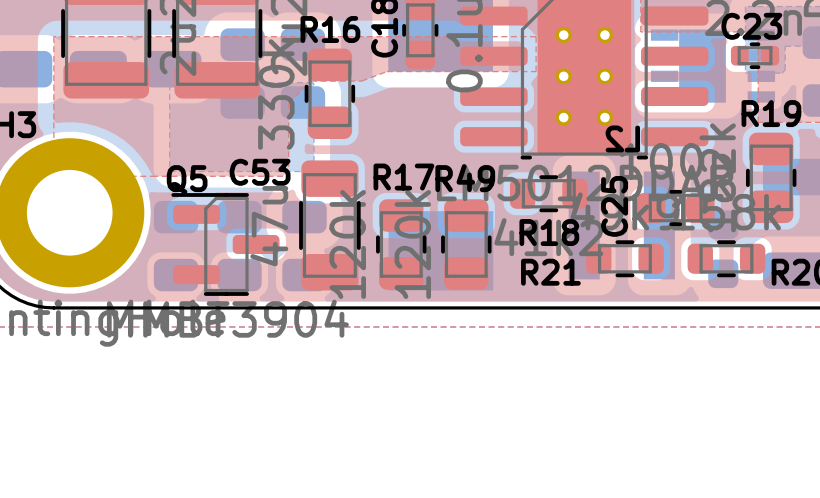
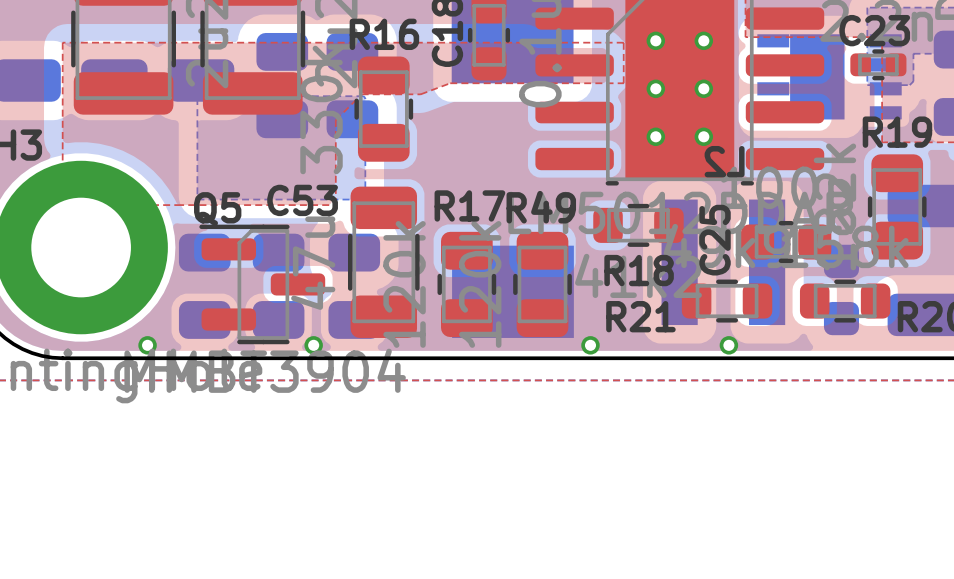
via: none -> (147, 345)
via: none -> (313, 345)
via: none -> (590, 345)
via: none -> (728, 345)

